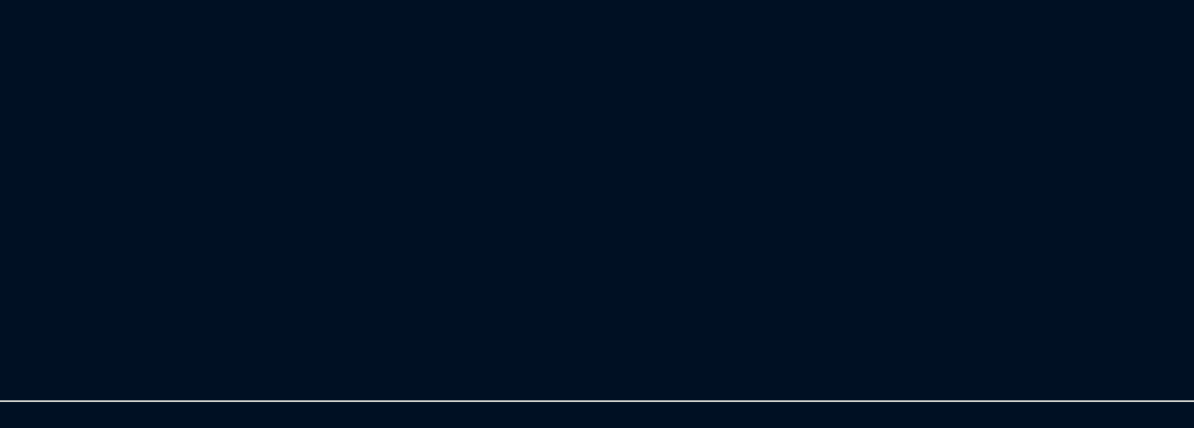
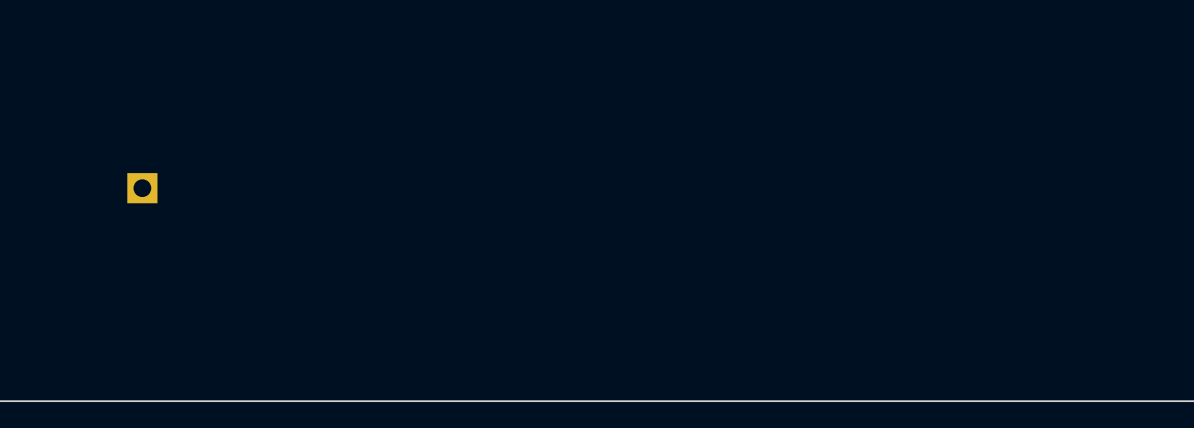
part: none -> (142, 188)

